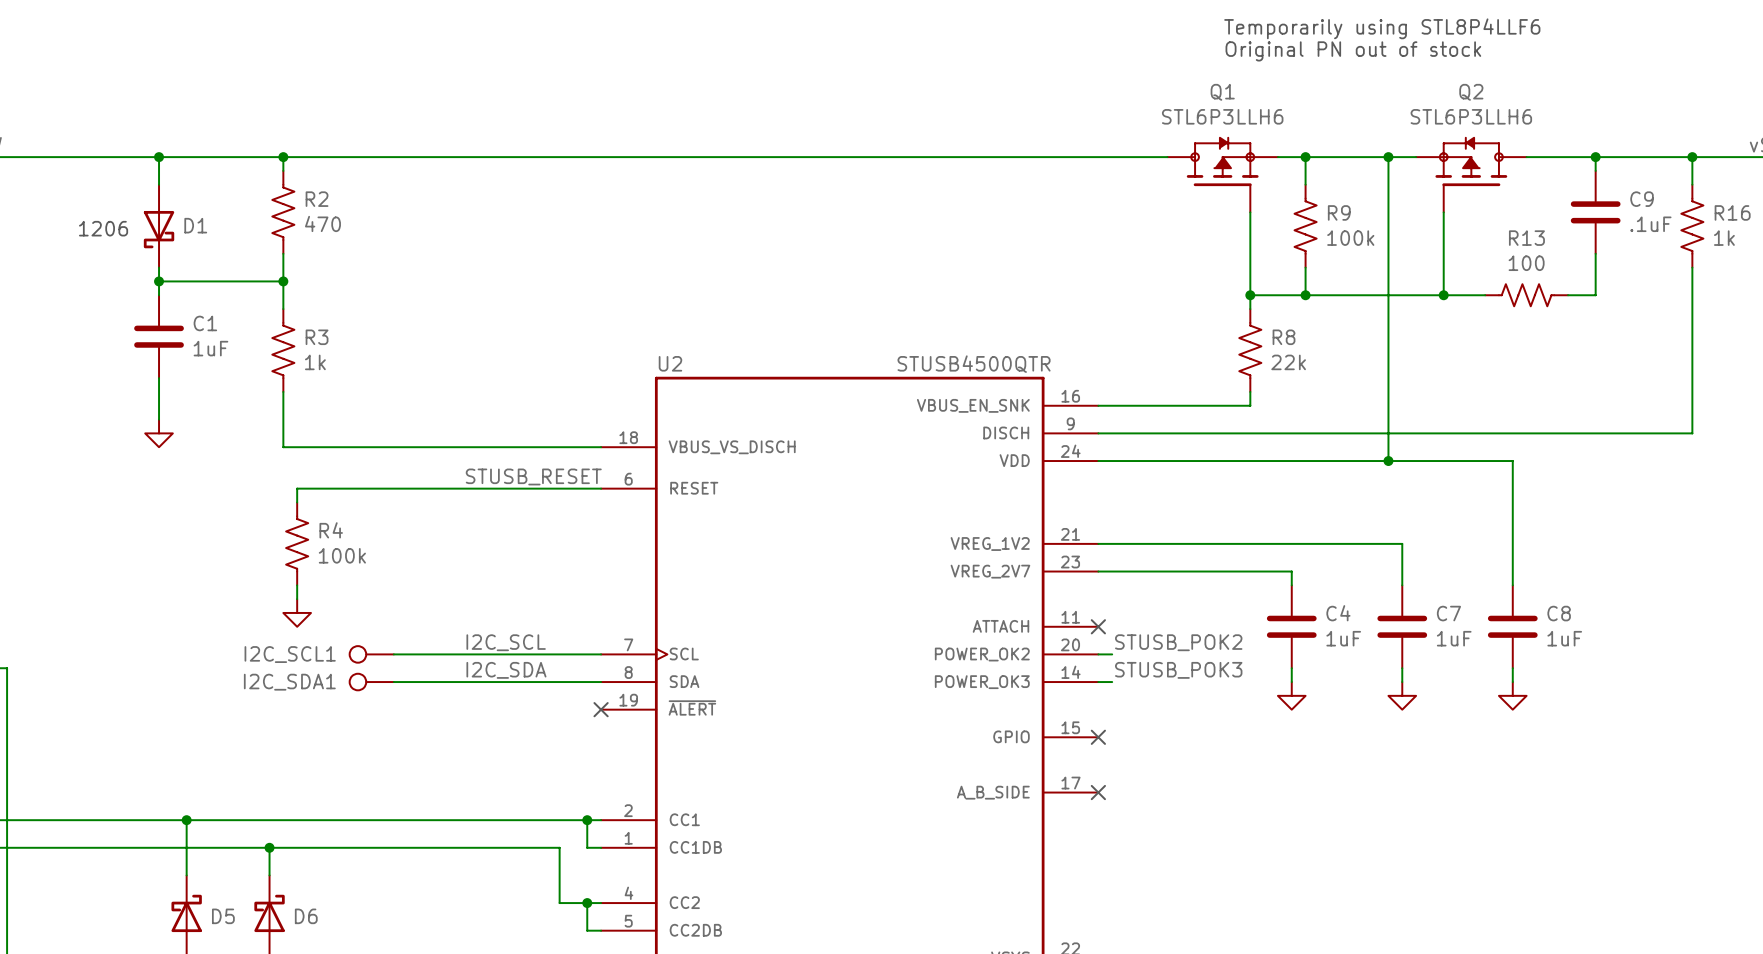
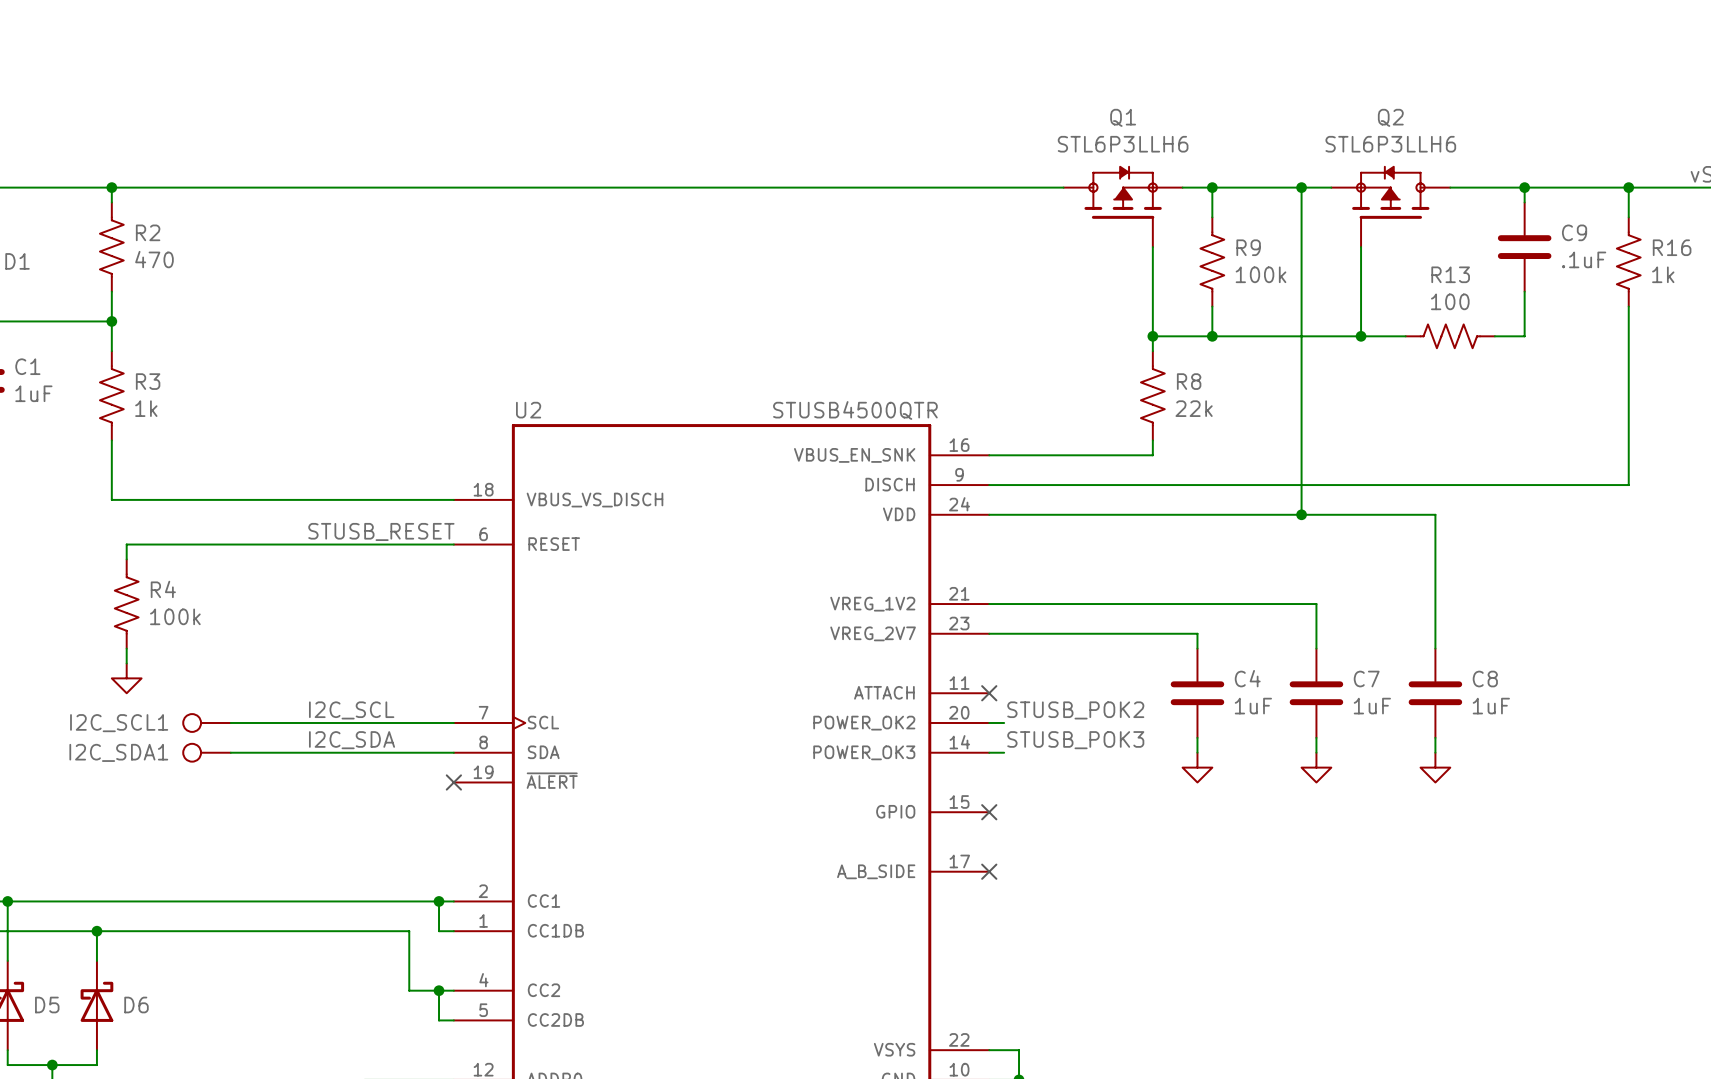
text: Temporarily using STL8P4LLF6 (1382, 28) -> none
text: Original PN out of stock (1353, 51) -> none

